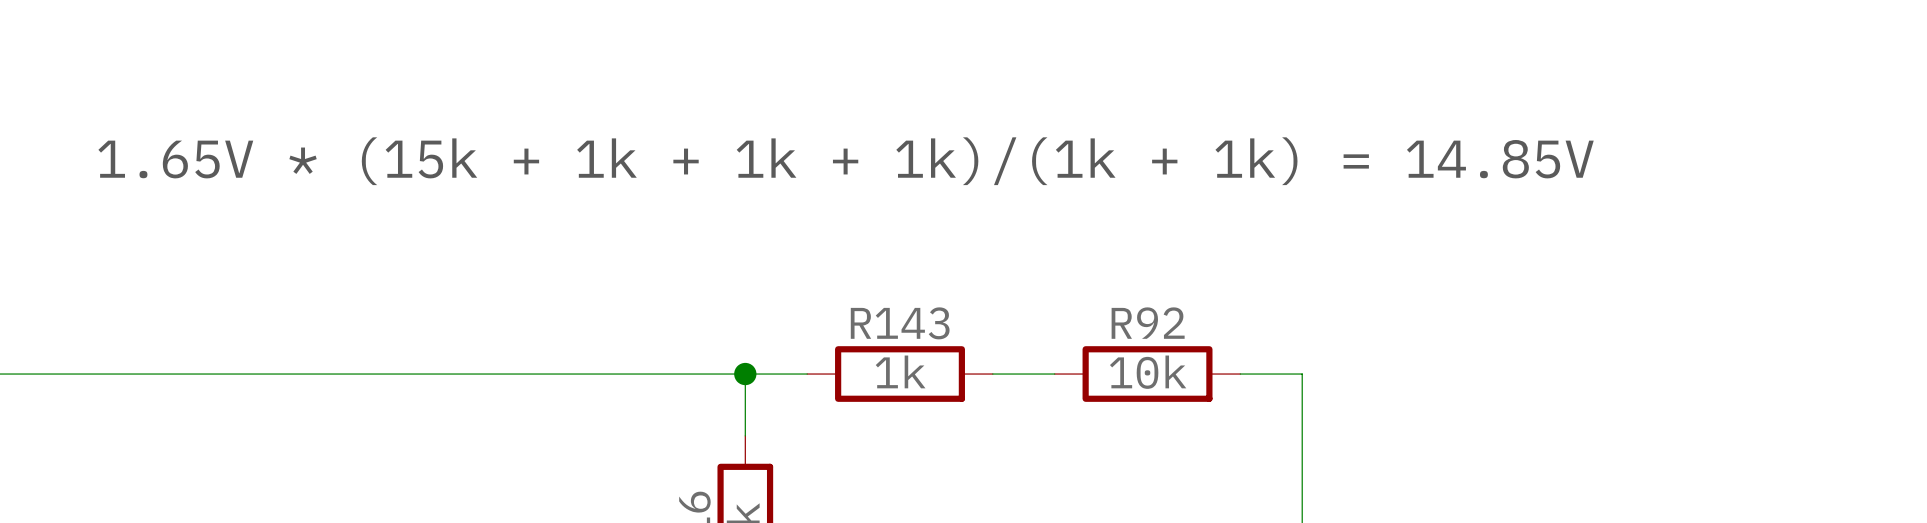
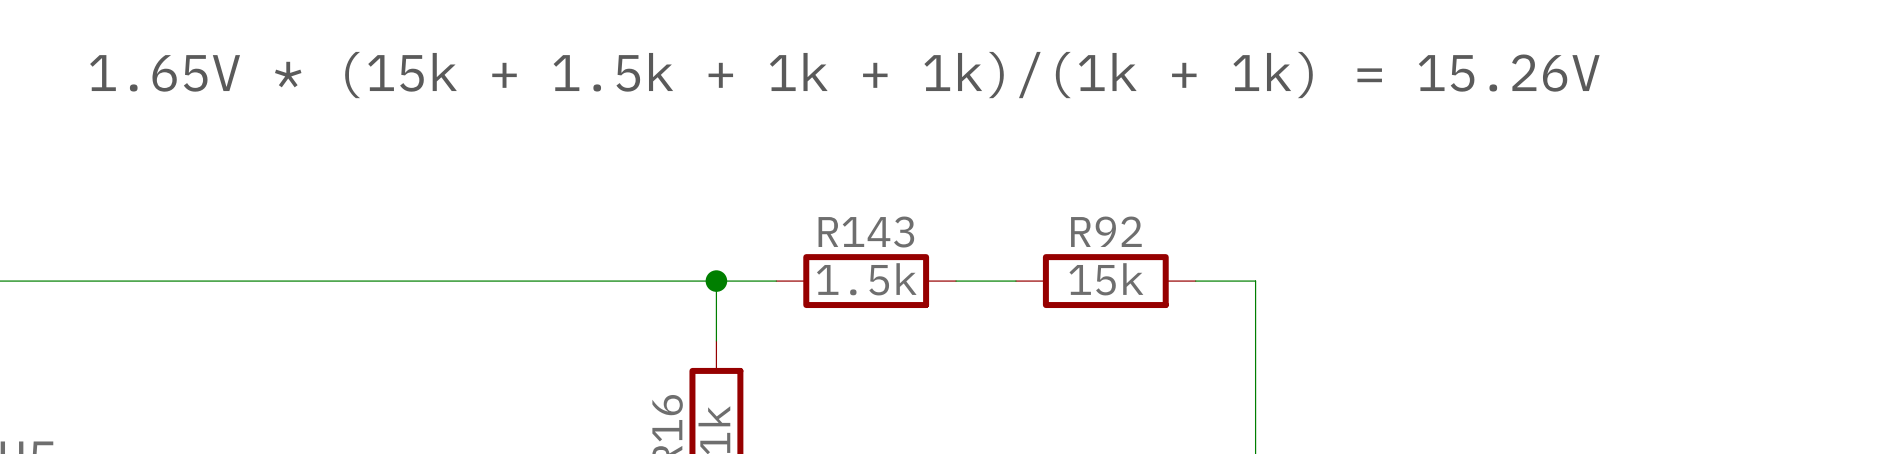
text: 1.65V * (15k + 1k + 1k + 1k)/(1k + 1k) = 14.85V (846, 161) -> 1.65V * (15k + 1.5k + 1k + 1k)/(1k + 1k) = 15.26V (844, 75)
R143 value: 1k (900, 371) -> 1.5k (866, 279)
R92 value: 10k (1148, 372) -> 15k (1106, 279)

